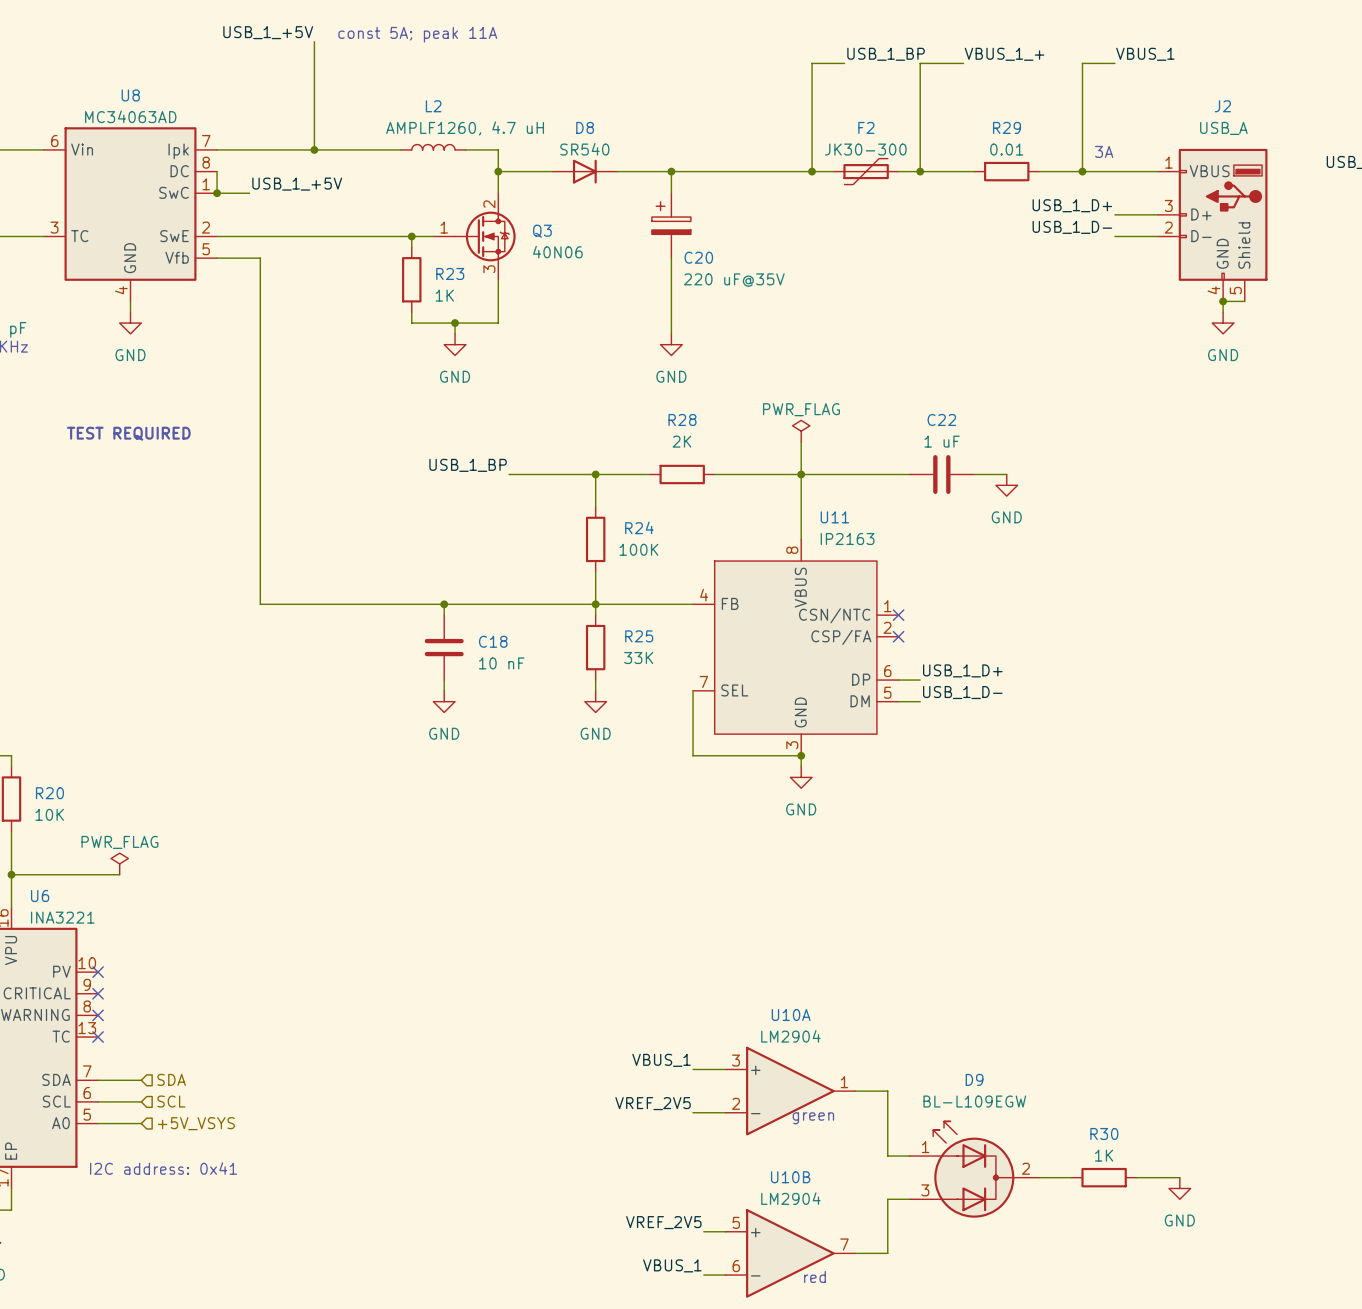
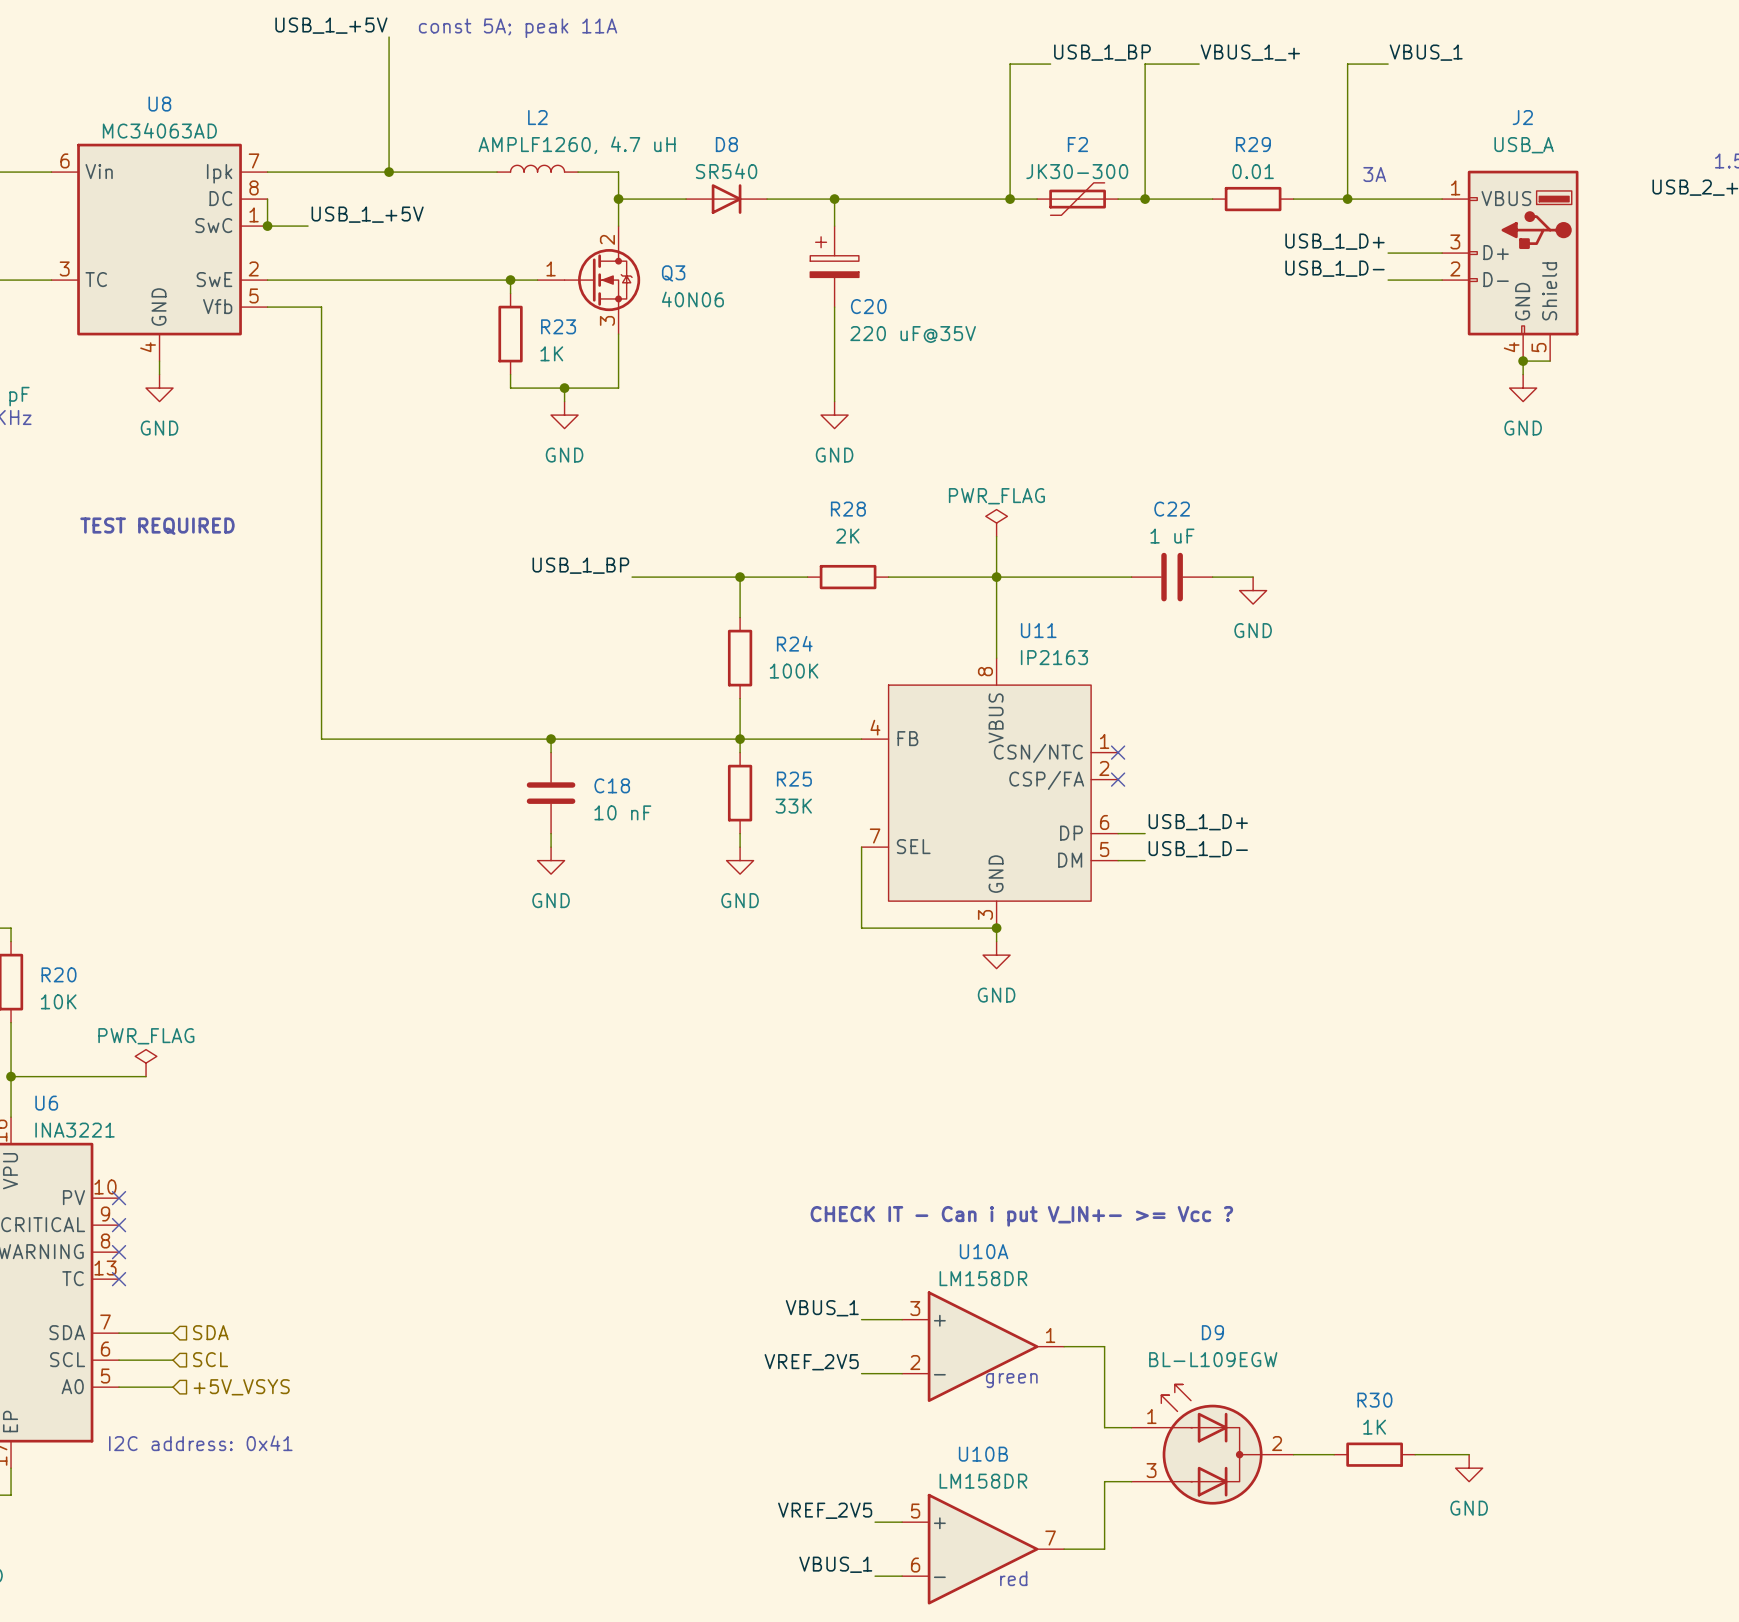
text: none -> CHECK IT - Can i put V_IN+- >= Vcc ? (1021, 1216)
U10A value: LM2904 (790, 1036) -> LM158DR (983, 1278)
U10B value: LM2904 (790, 1198) -> LM158DR (983, 1481)

